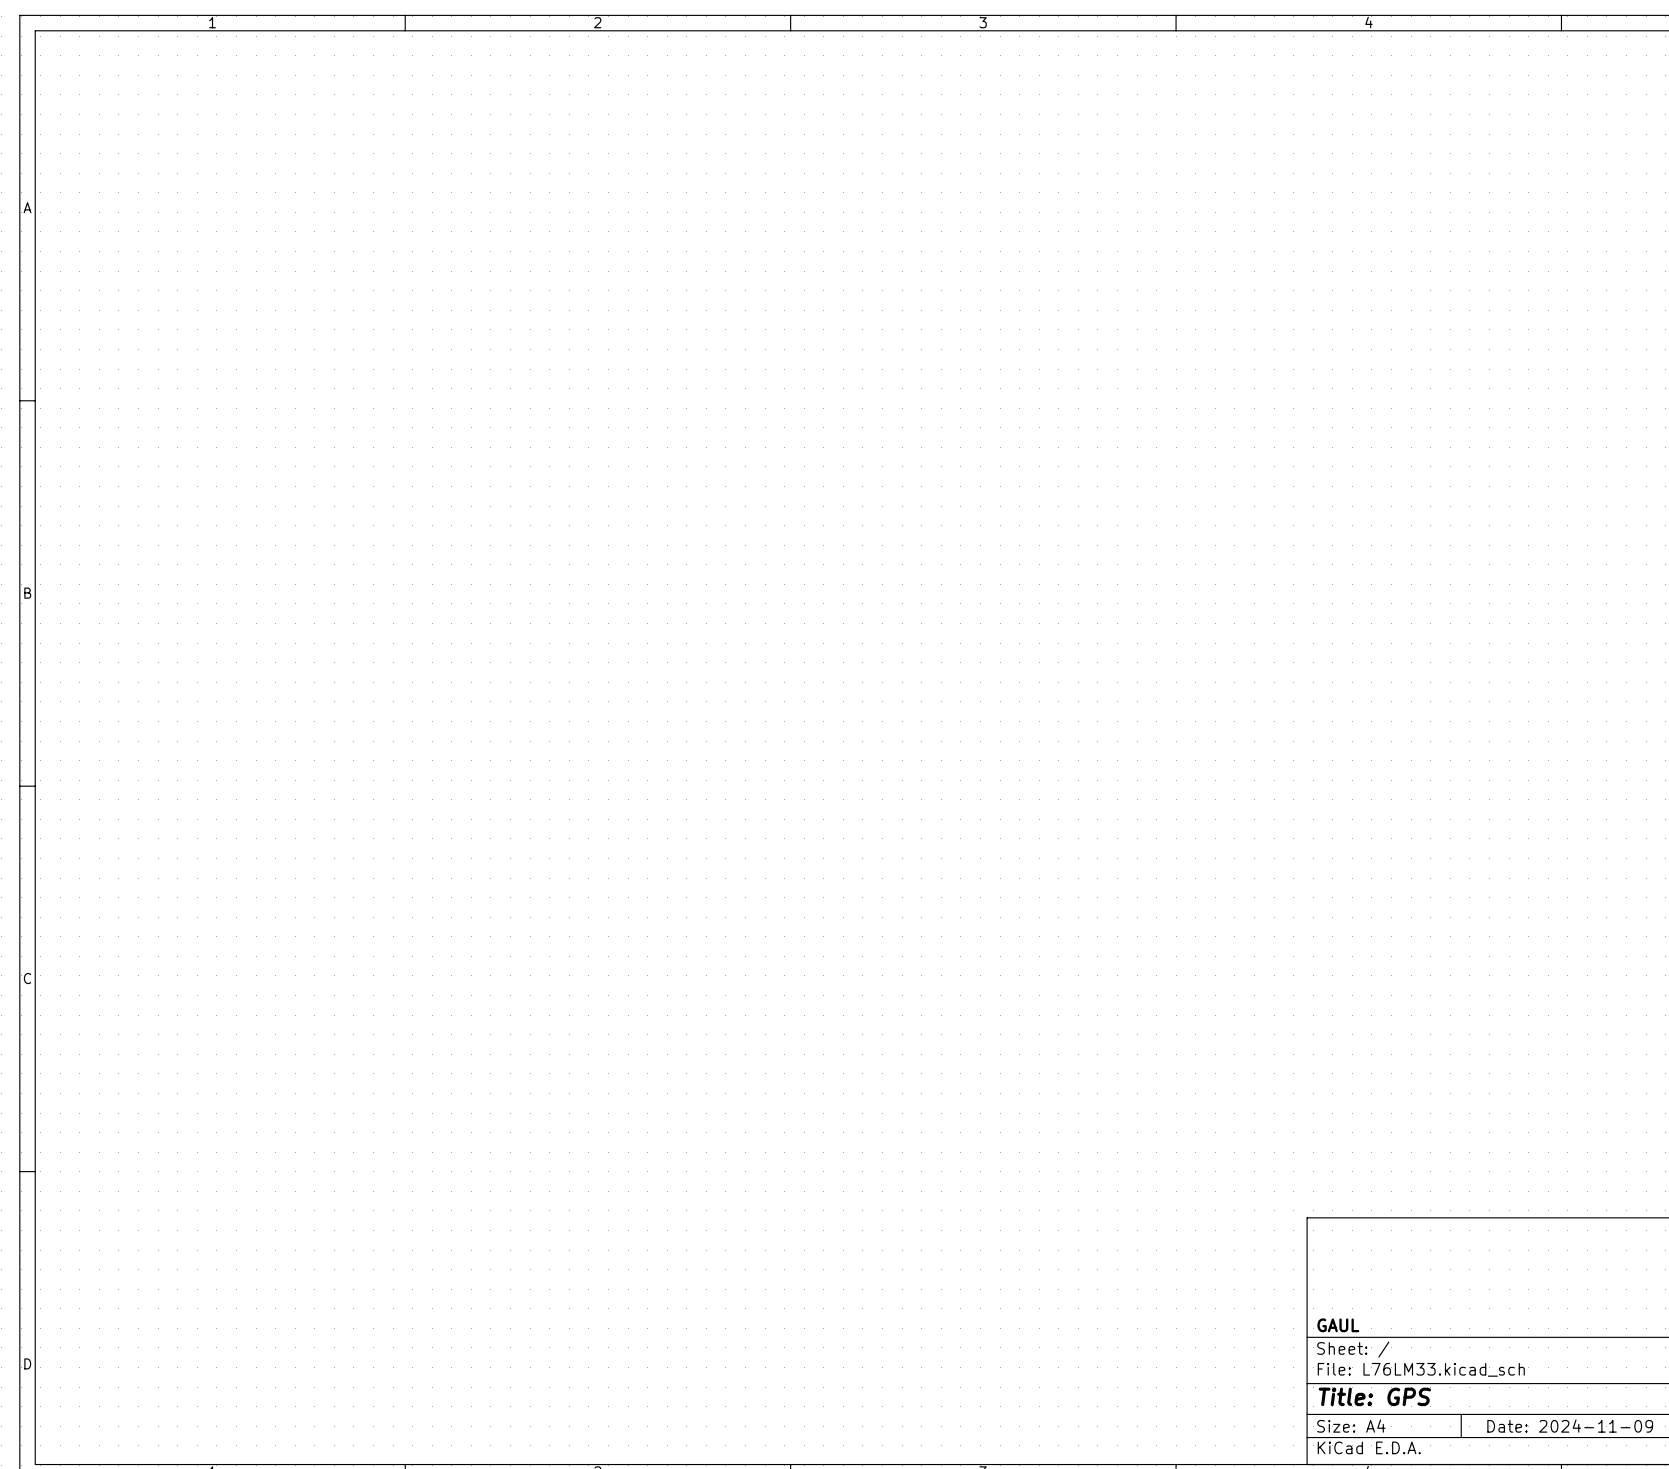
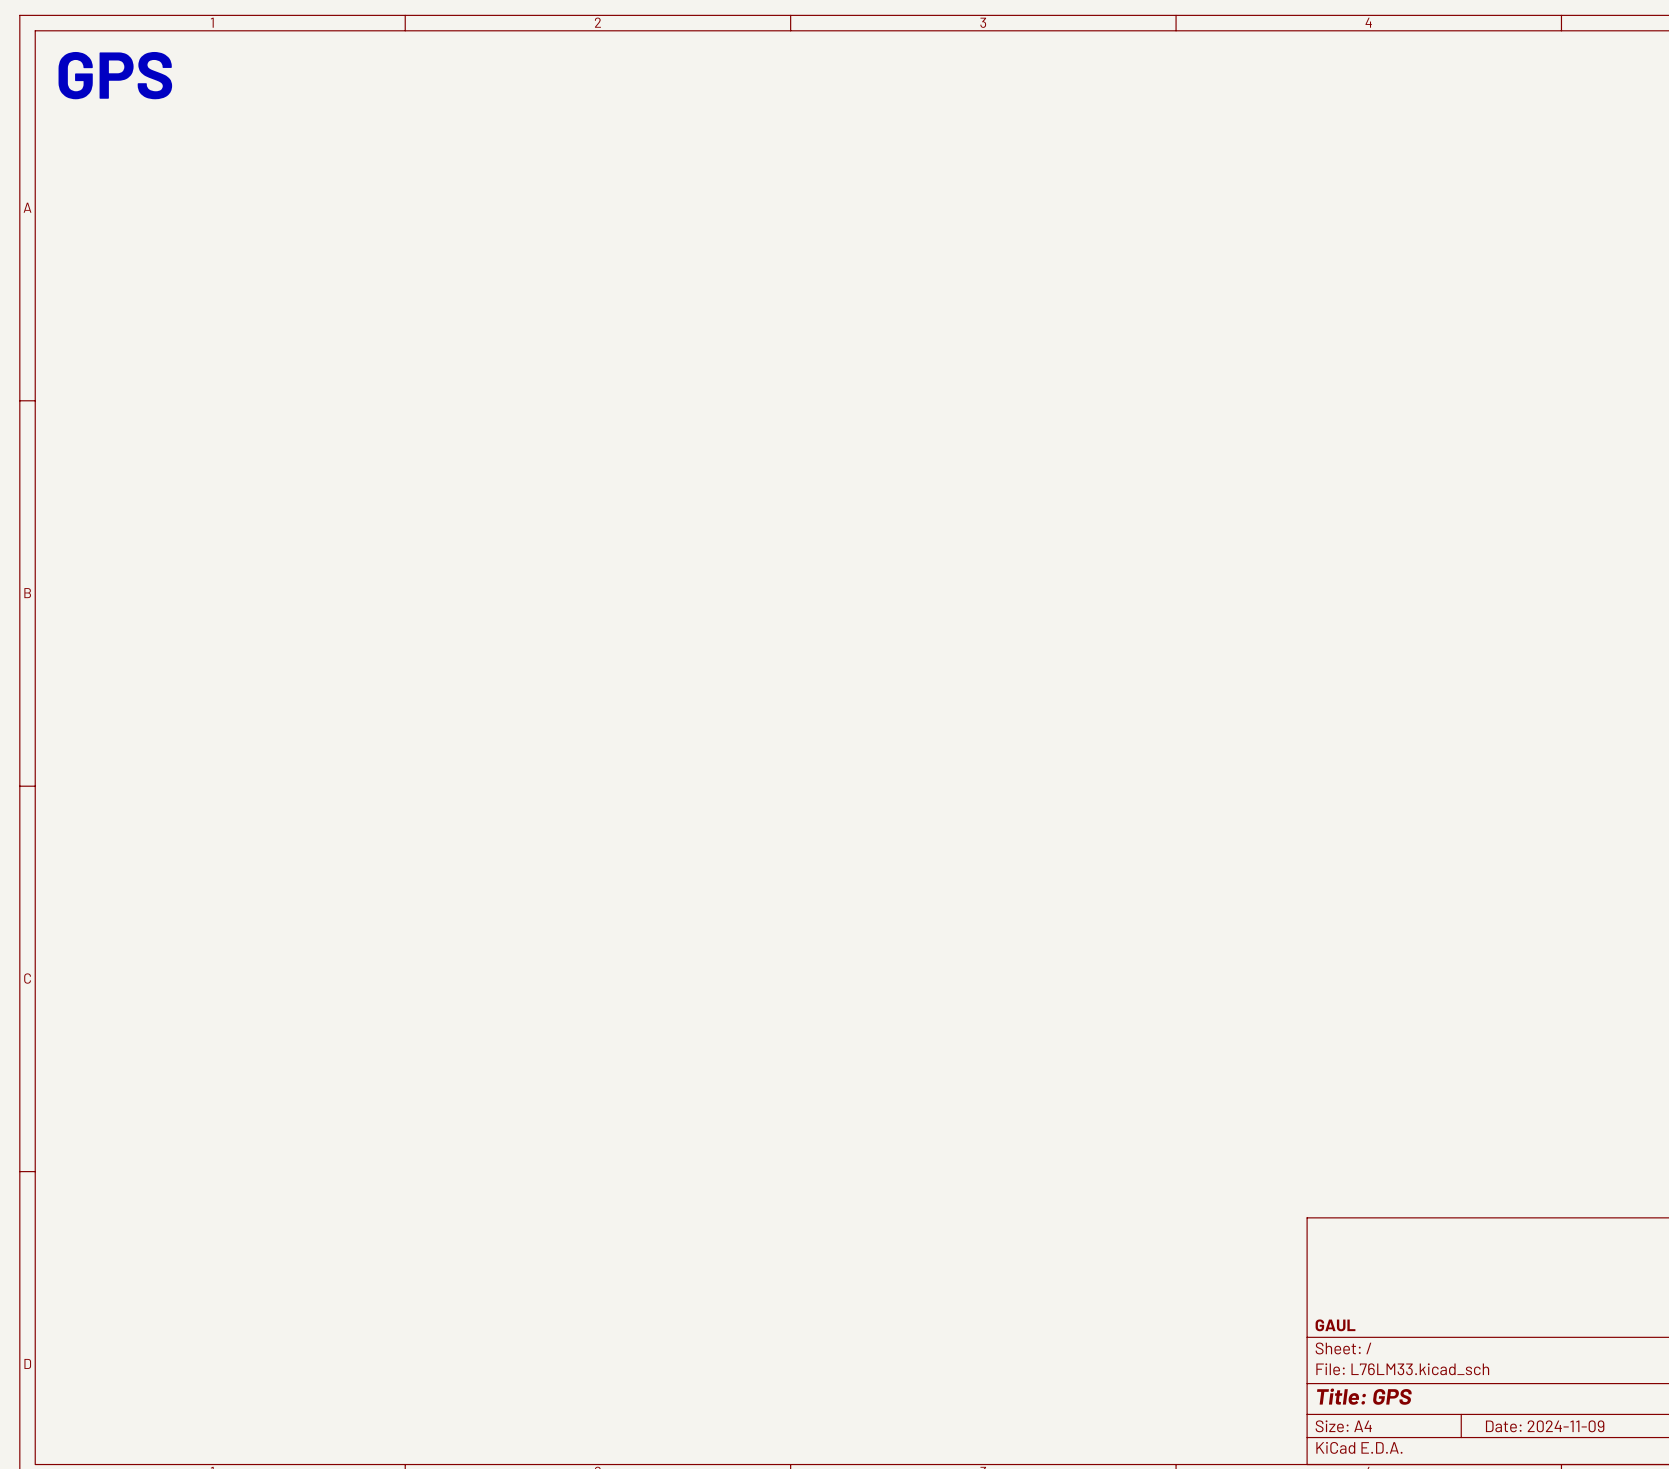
text: none -> GPS (115, 75)

